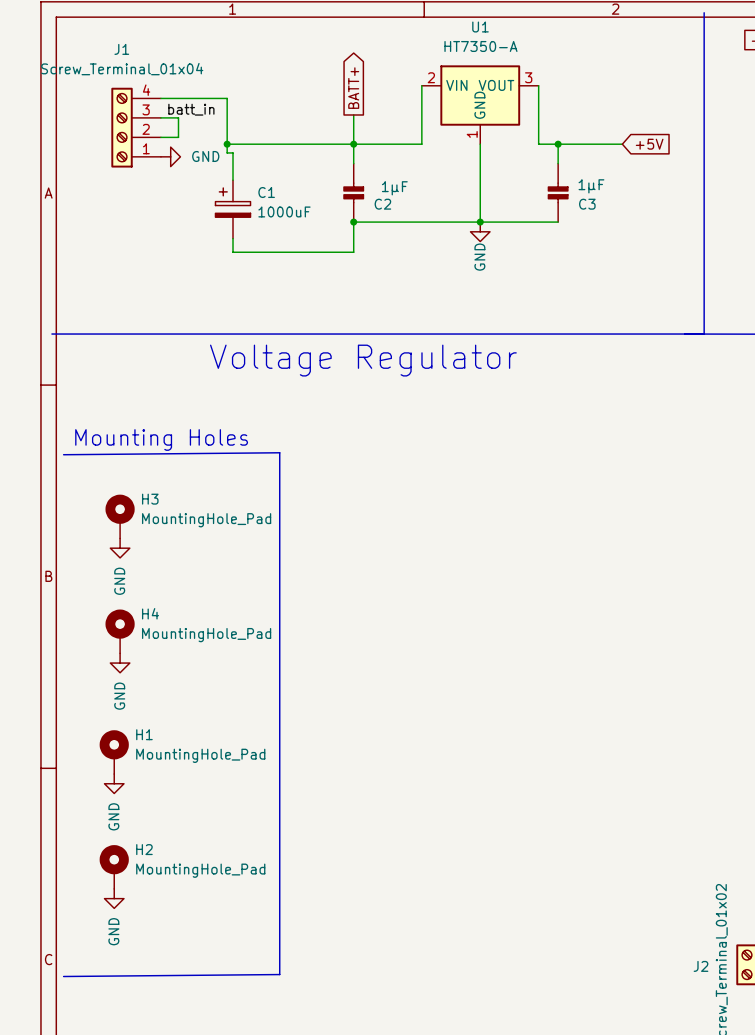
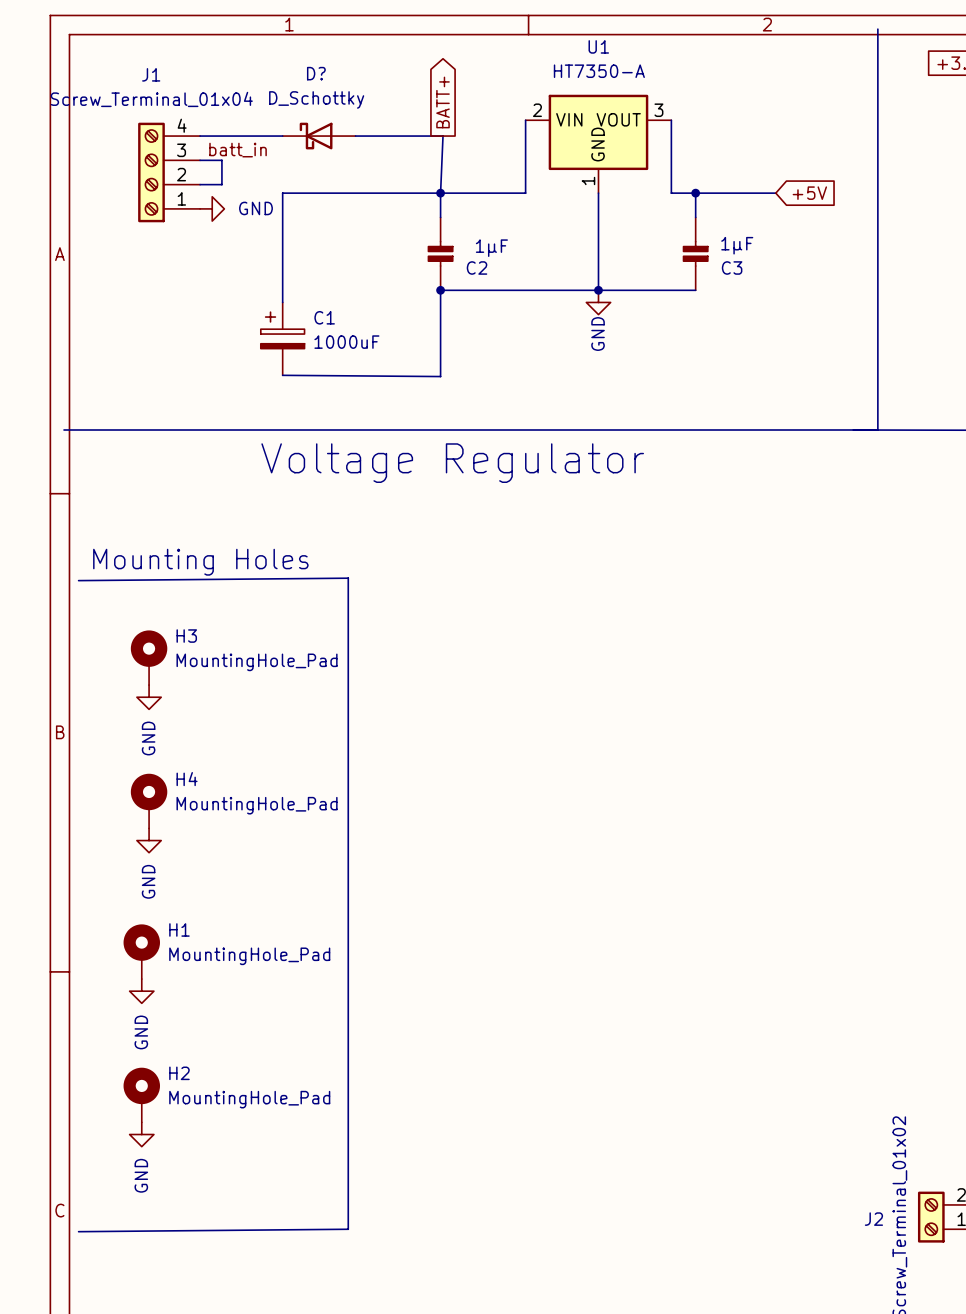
global label position: BATT+ (353, 88) -> BATT+ (443, 102)
wire: (227, 98) (227, 144) -> none
D?: none -> D_Schottky (319, 136)
wire: (353, 114) (353, 144) -> (355, 136) (443, 136) (440, 193)
junction: (227, 144) -> none
wire: (227, 152) (233, 152) (233, 180) -> (282, 204) (282, 302)
C1 position: (233, 209) -> (282, 338)
wire: (233, 238) (233, 252) (353, 252) -> (282, 375) (440, 376) (440, 327)

